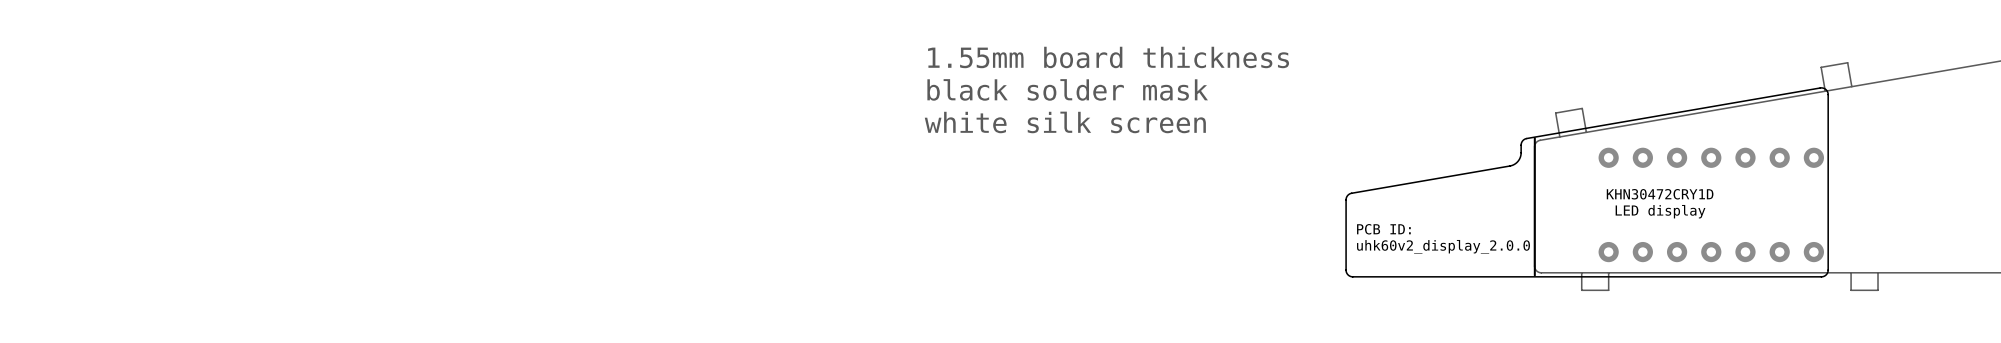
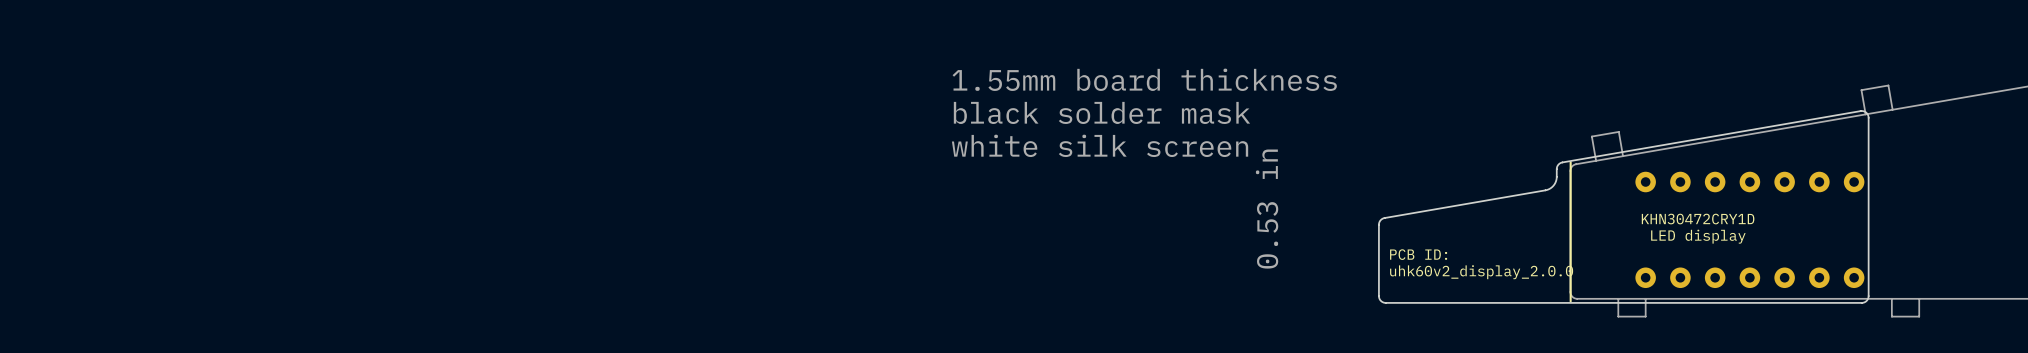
text: none -> 0.53 in (1267, 209)

